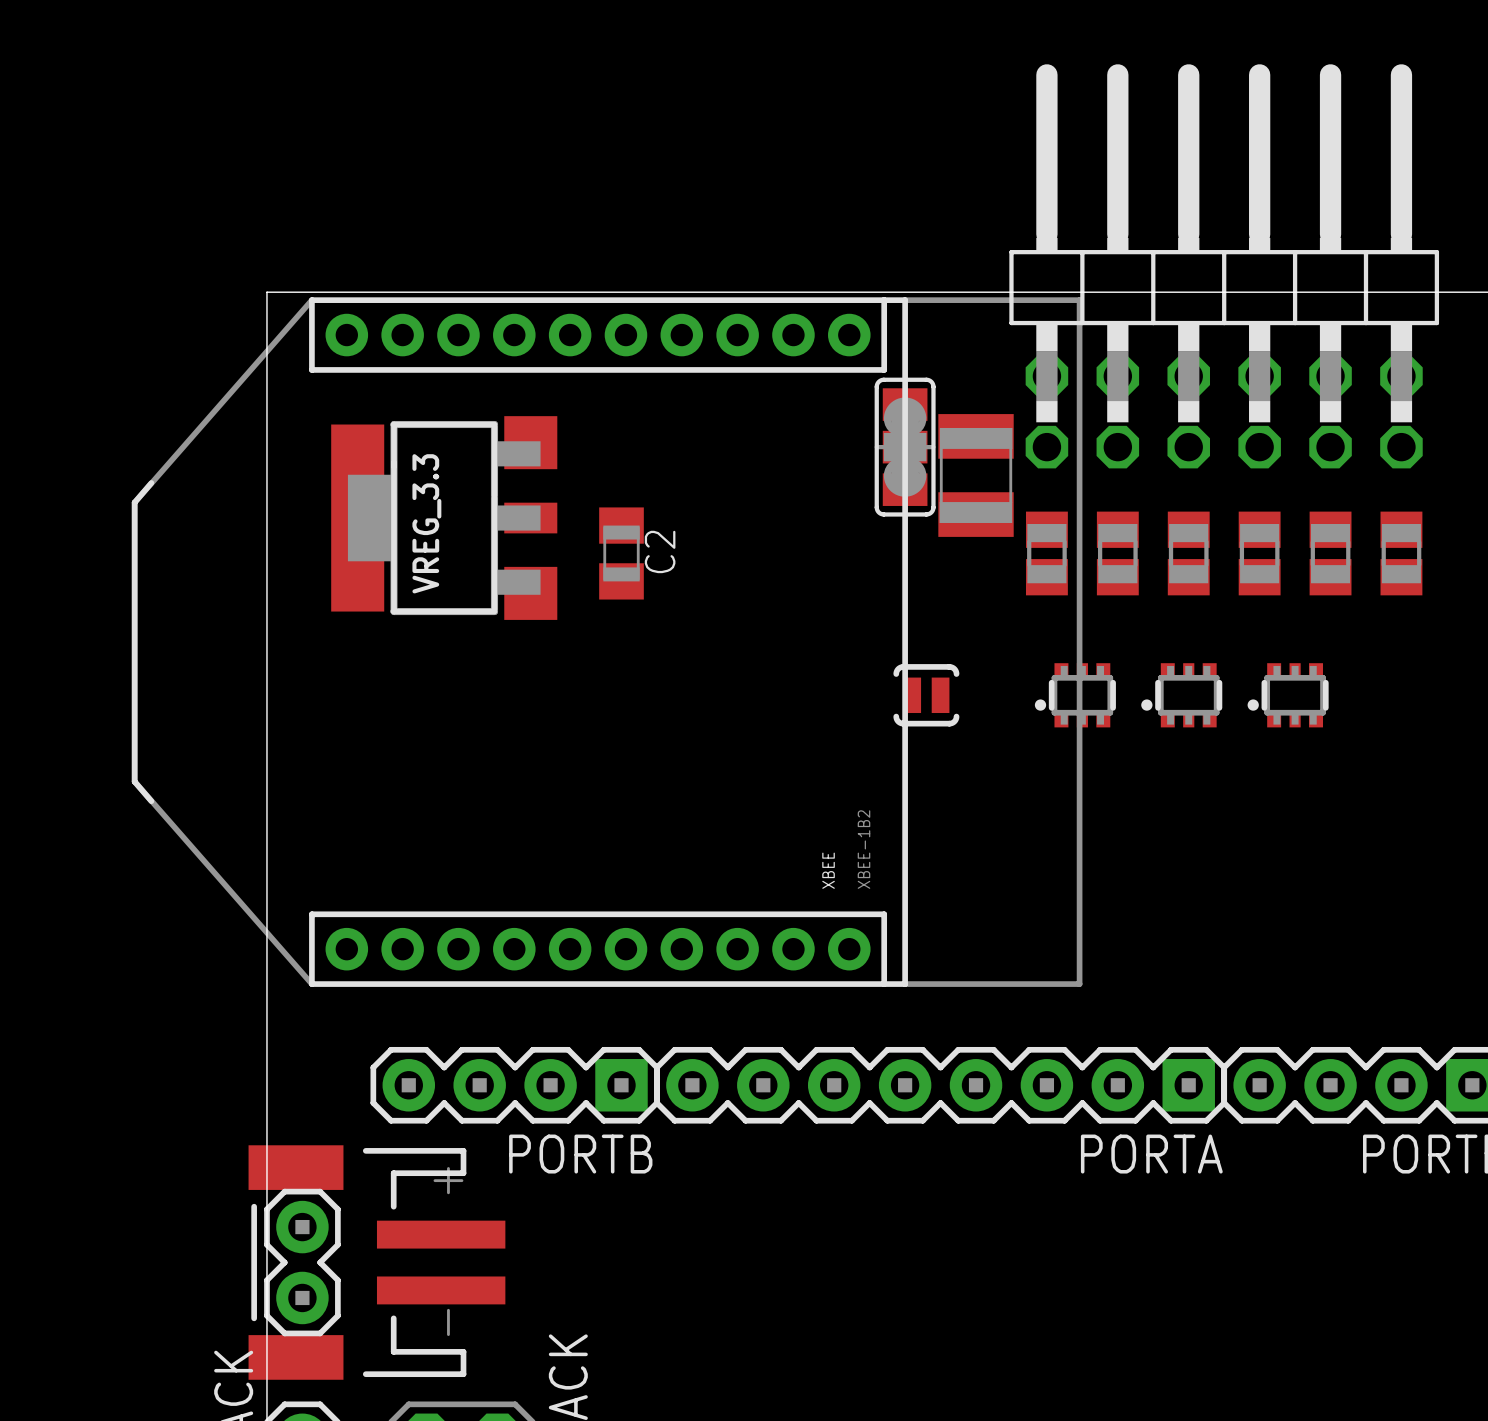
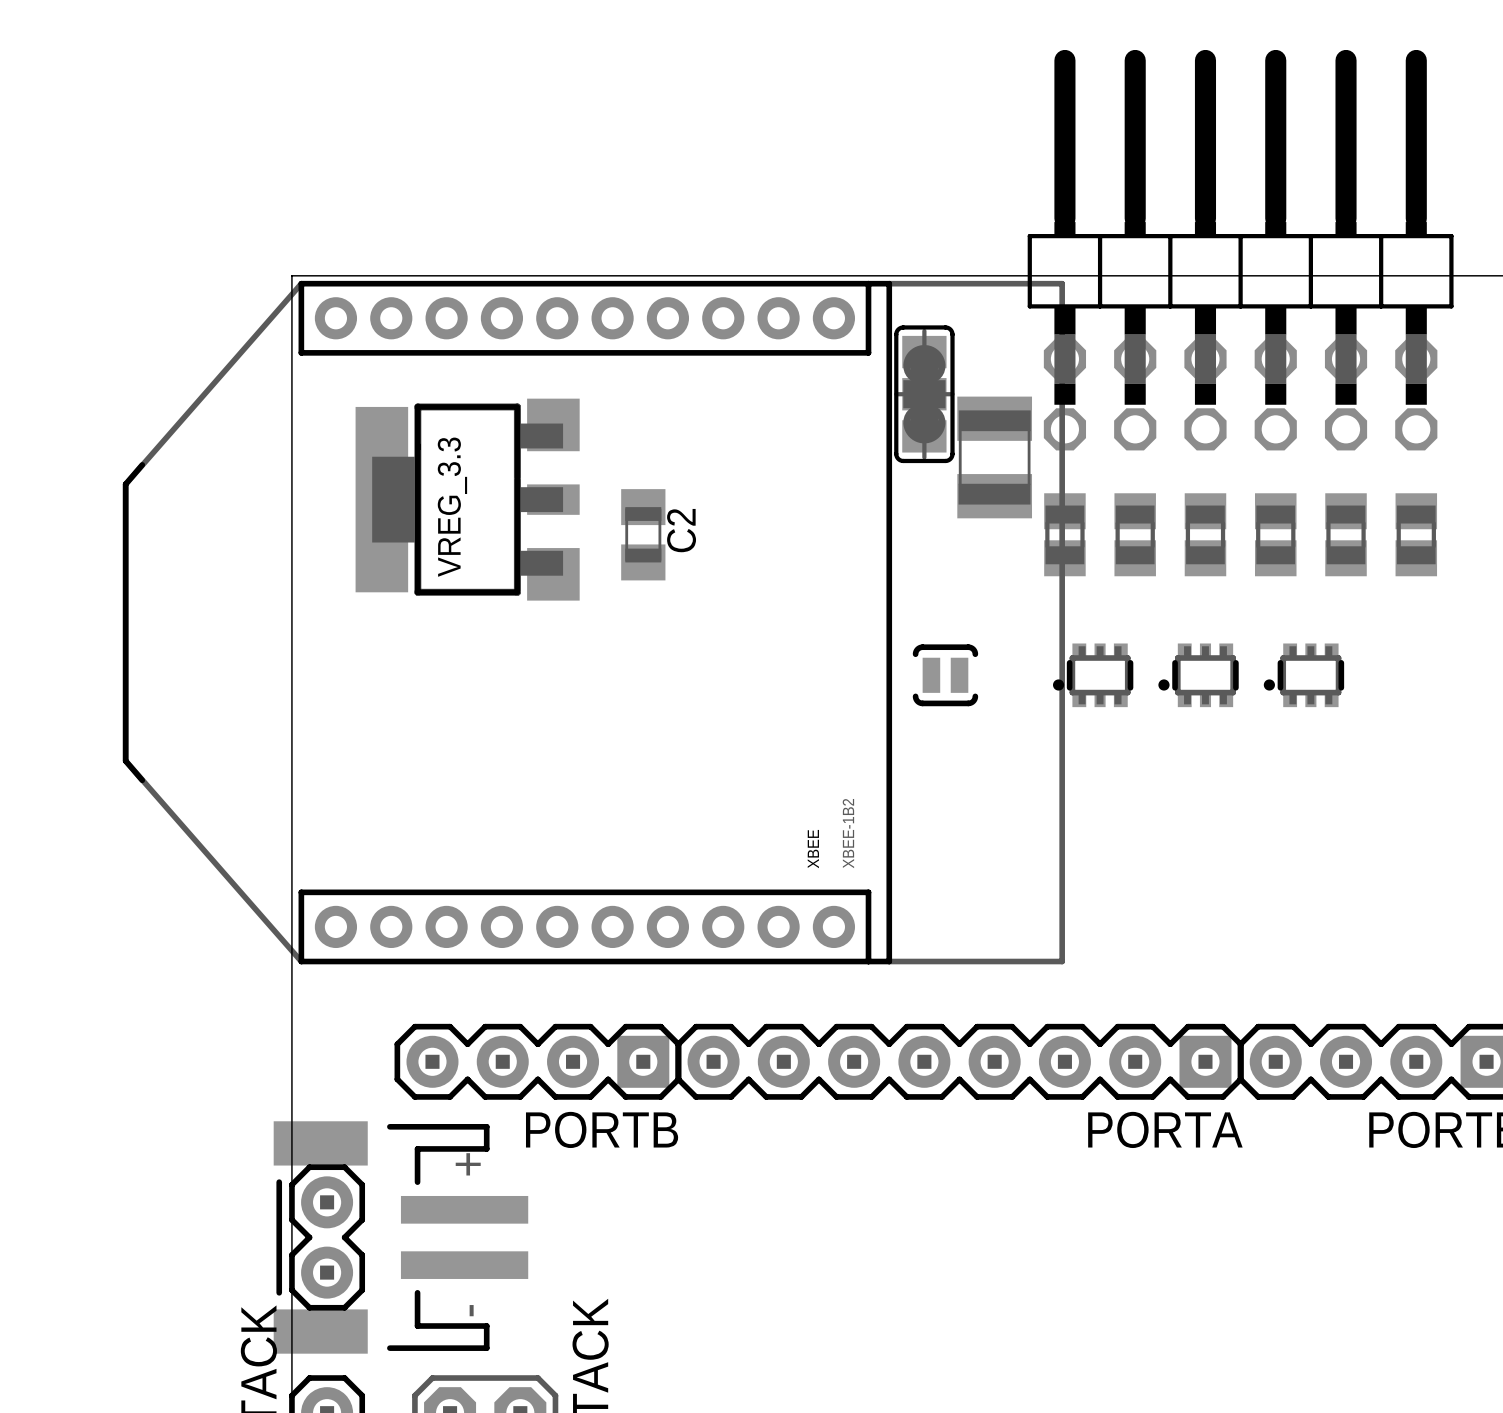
part position: (905, 447) -> (924, 394)
XBEE position: (607, 642) -> (593, 622)

